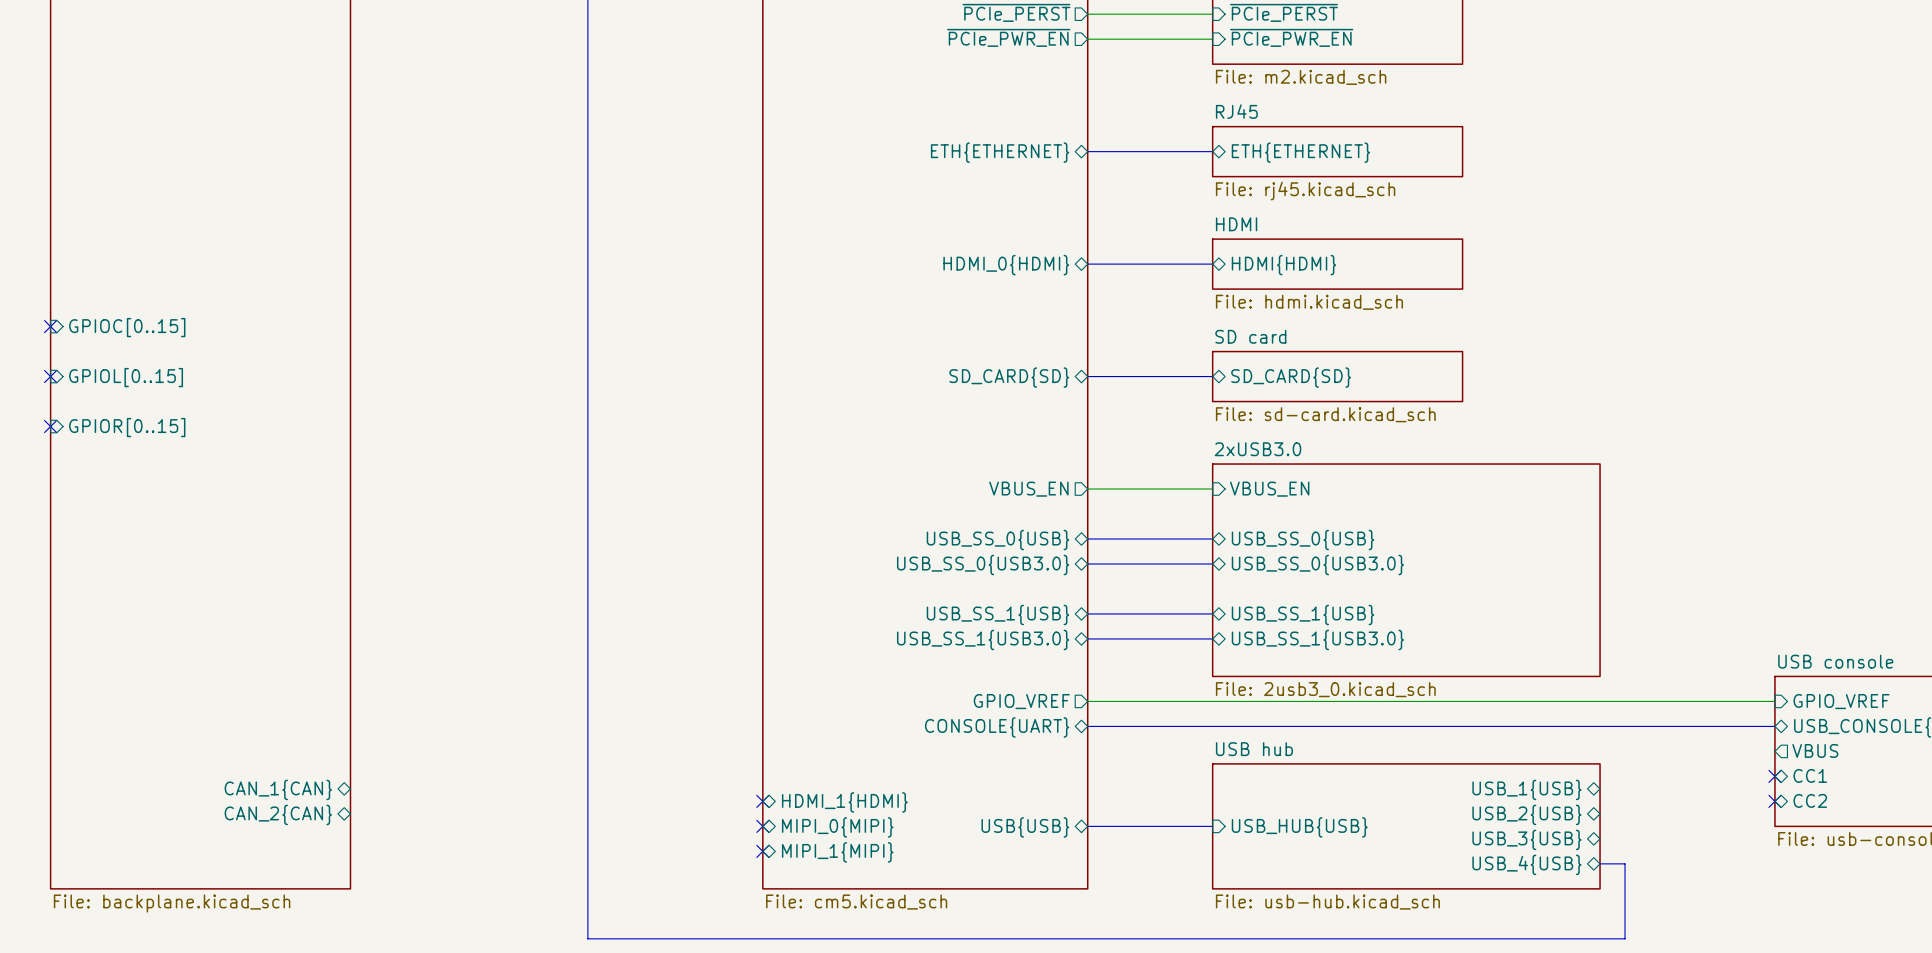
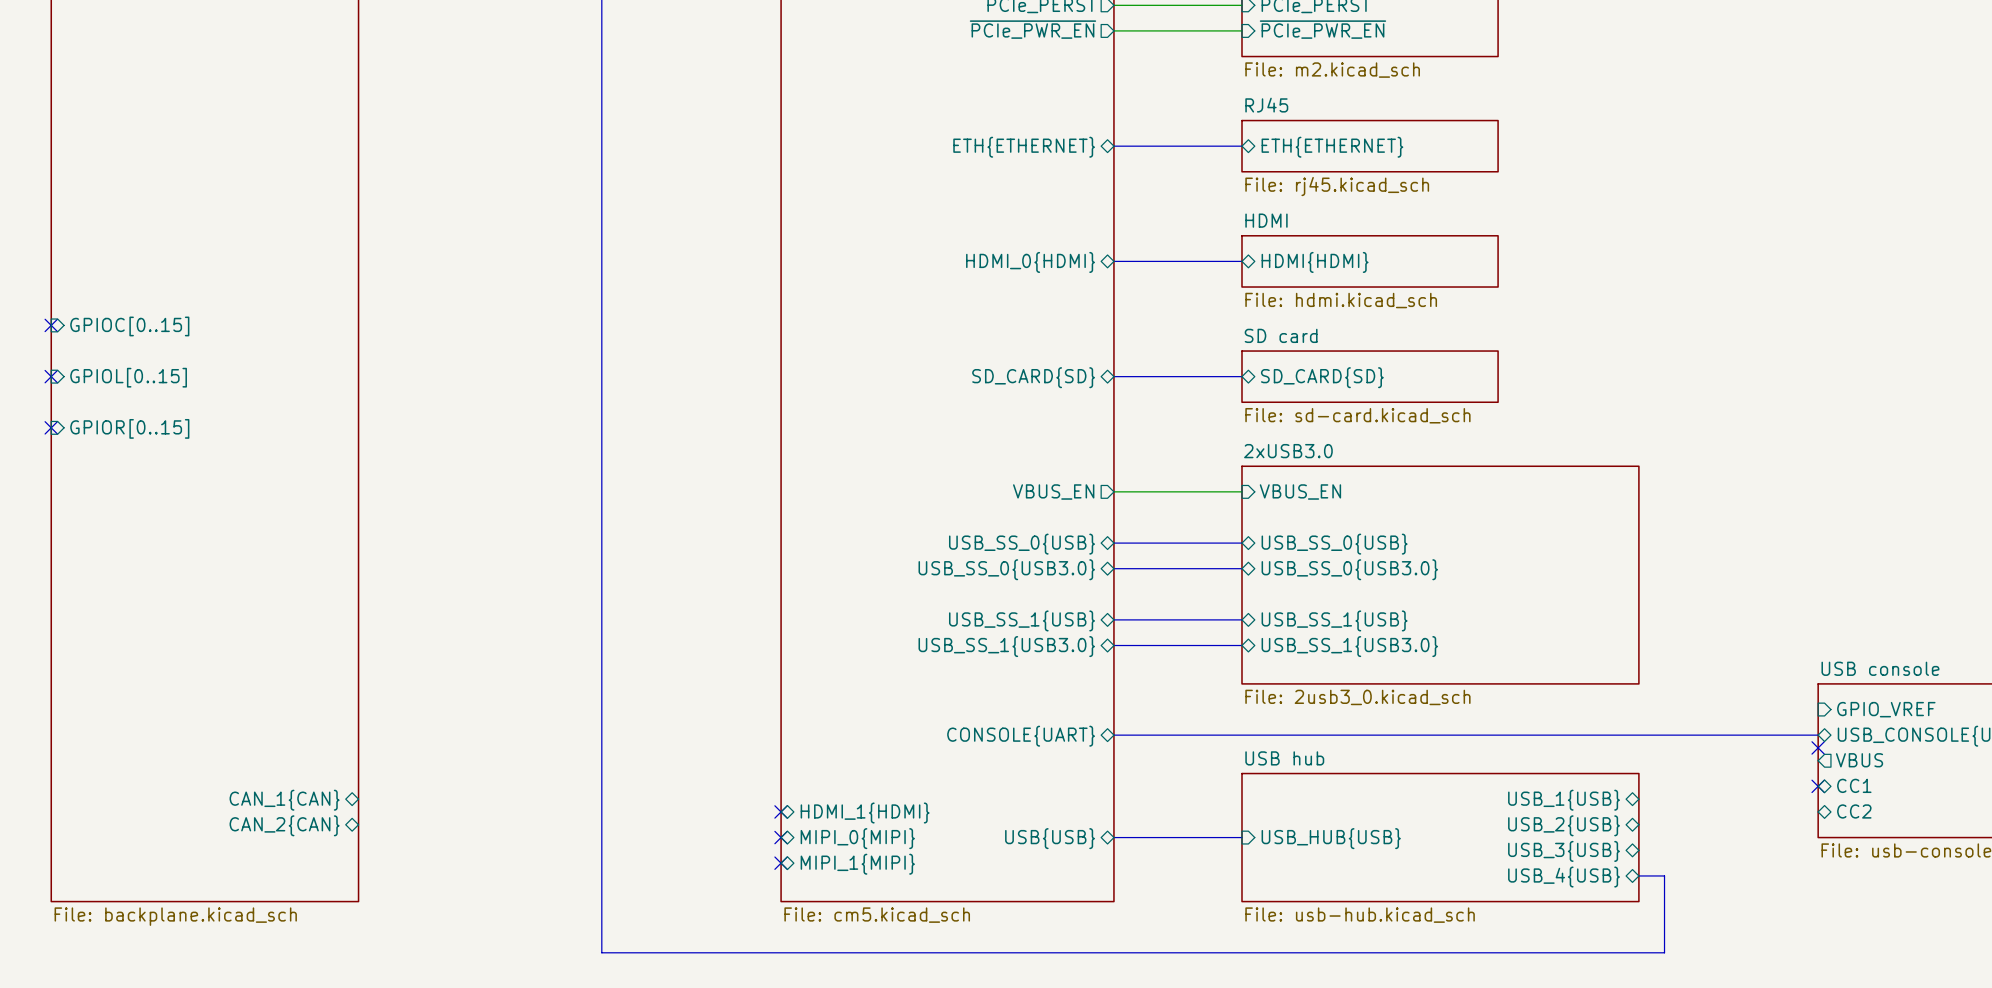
sheet pin: GPIO_VREF (1021, 701) -> none
wire: (1087, 701) (1774, 701) -> none
no-connect mark: none -> (1818, 747)
no-connect mark: (1774, 801) -> none

